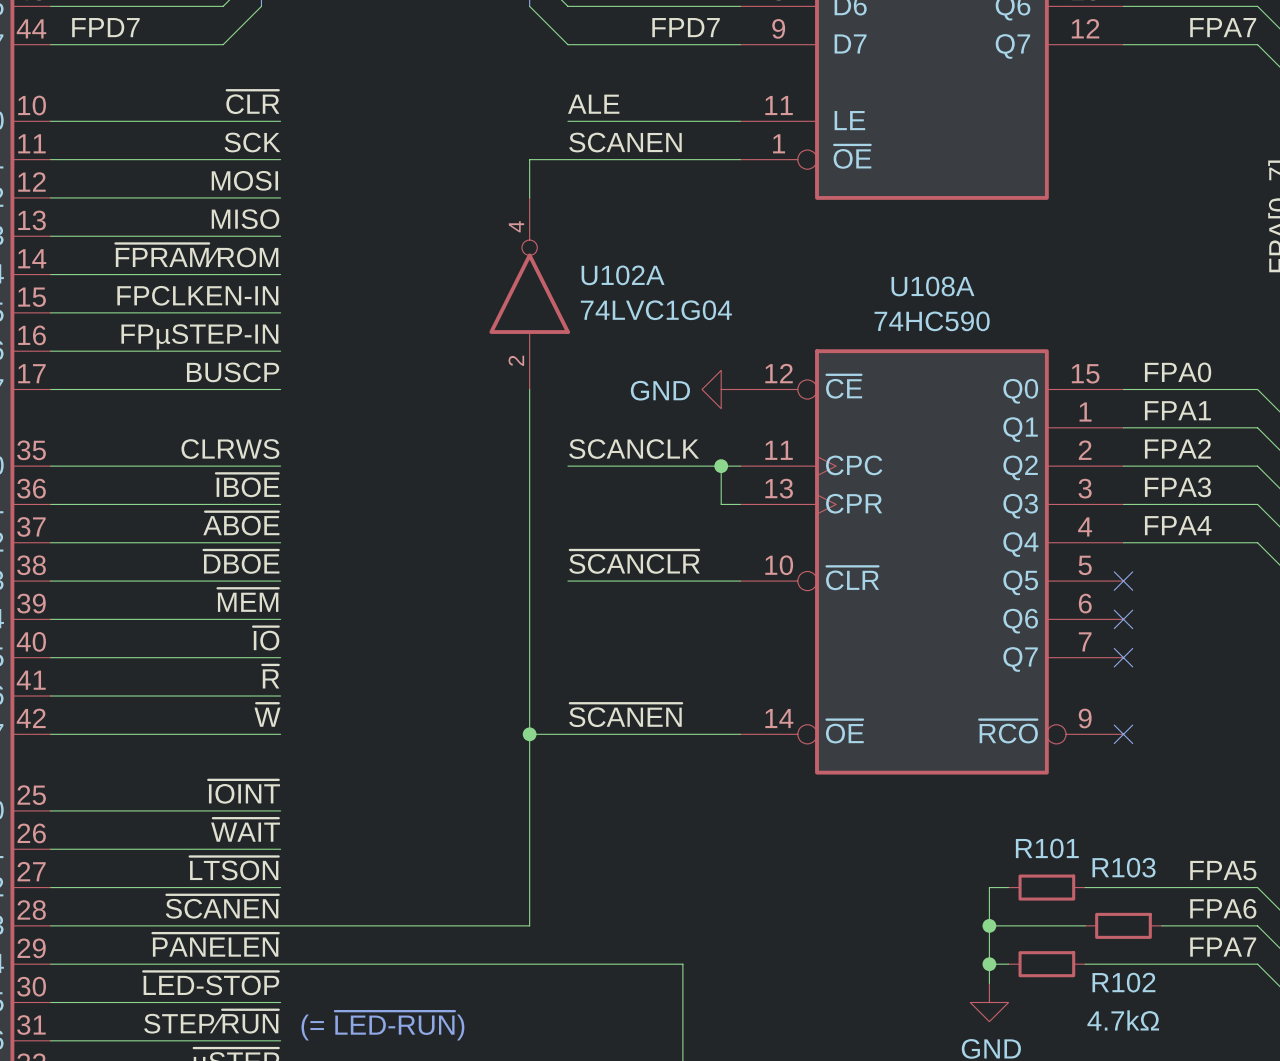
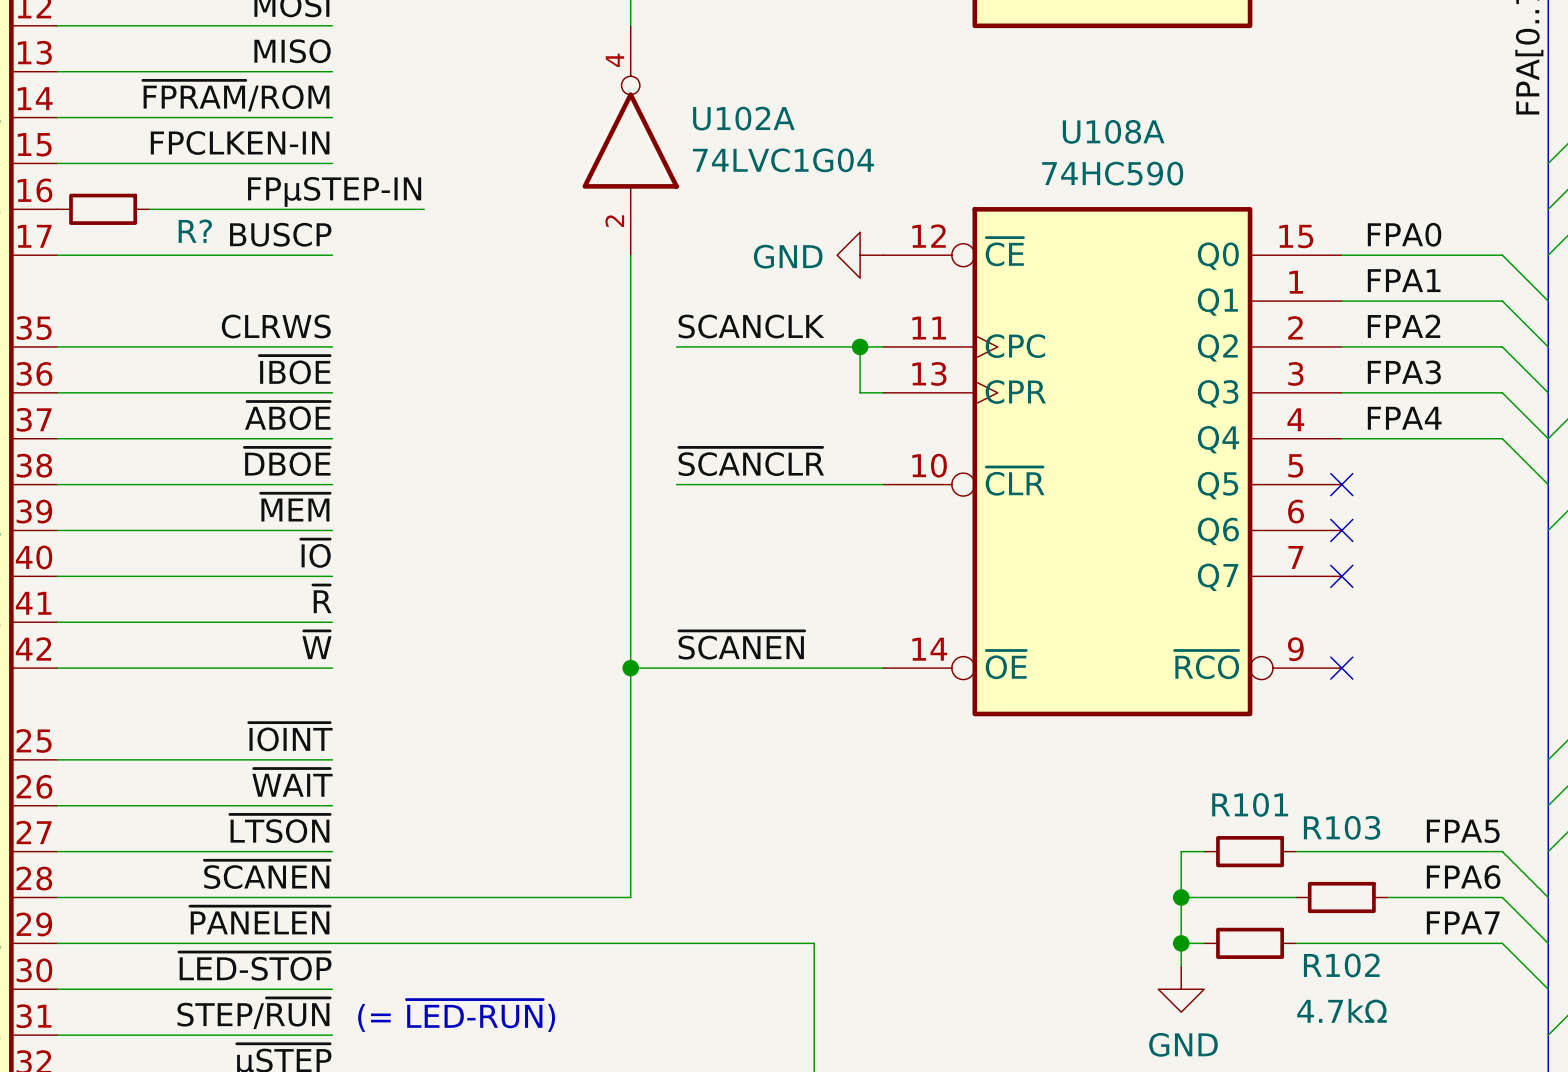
label position: FPµSTEP-IN (199, 336) -> FPµSTEP-IN (334, 191)
wire: (50, 351) (127, 351) -> (332, 209) (424, 209)
R?: none -> (103, 209)

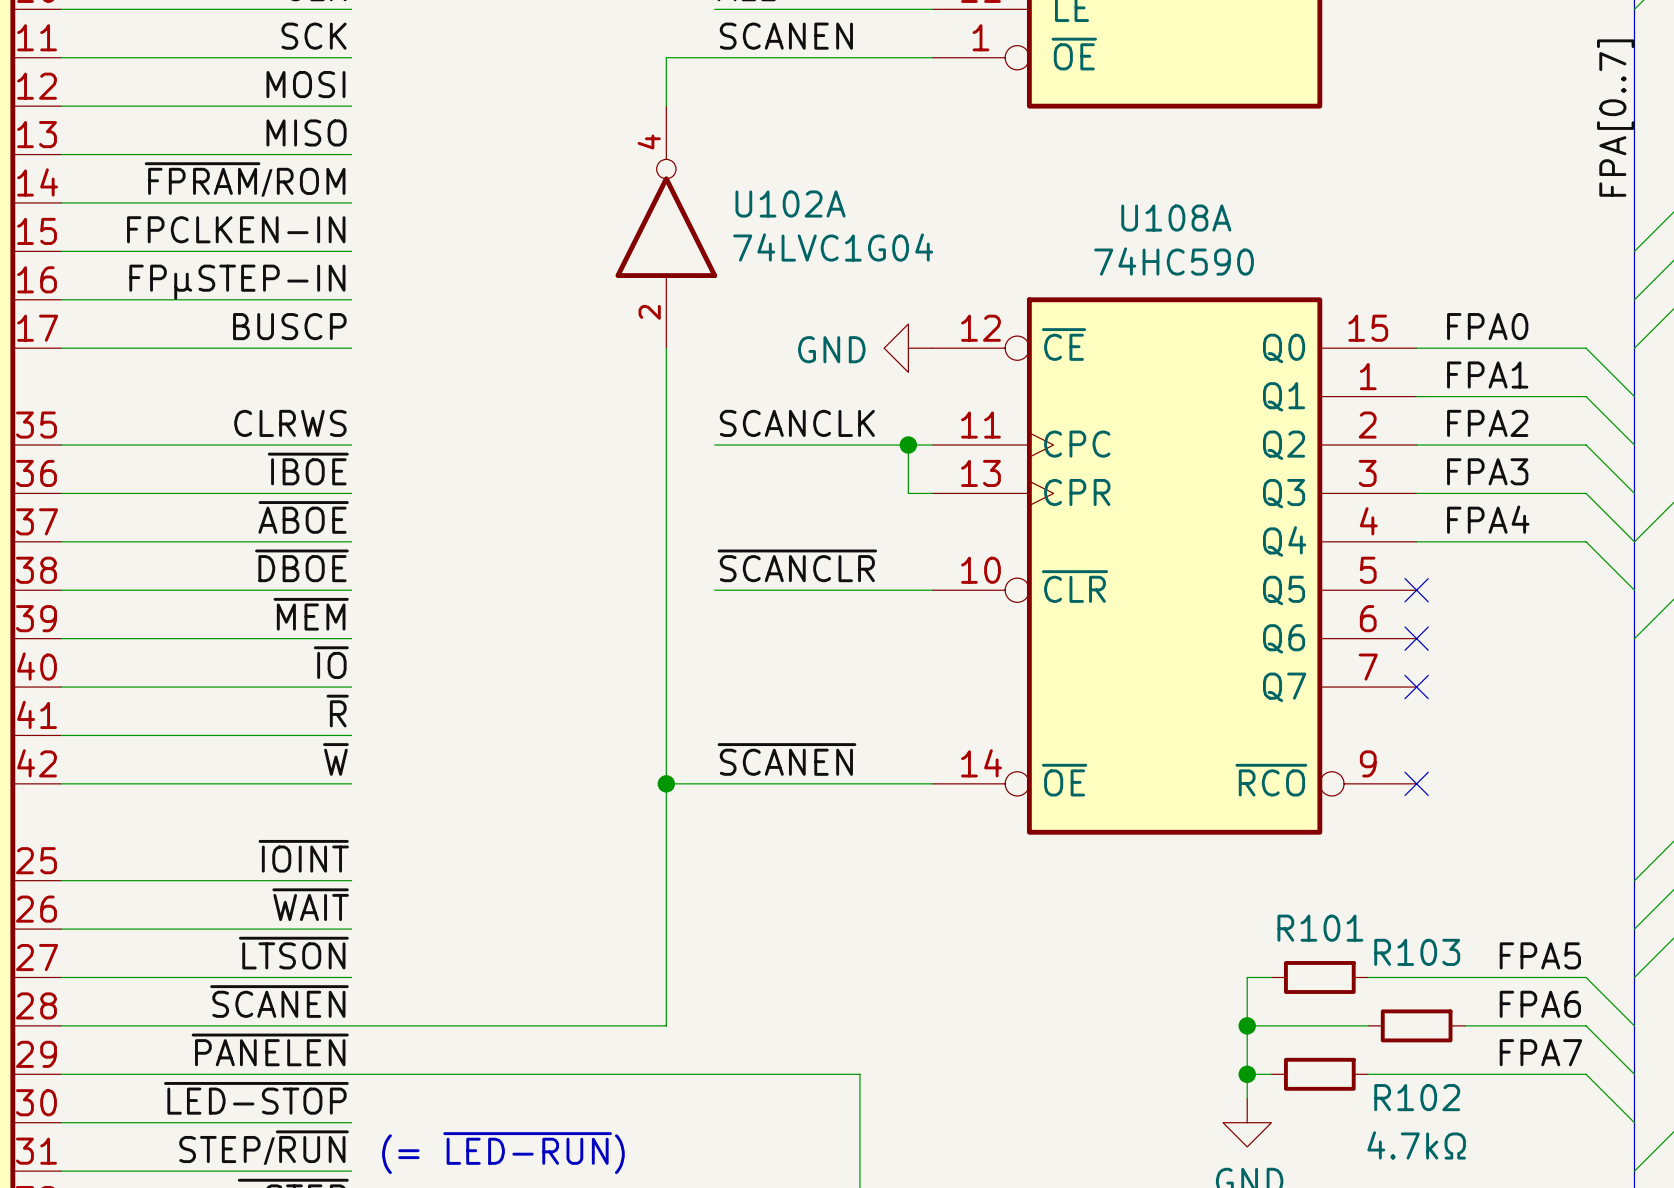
label position: FPµSTEP-IN (334, 191) -> FPµSTEP-IN (237, 282)
R?: (103, 209) -> none
wire: (332, 209) (424, 209) -> (61, 299) (158, 299)

